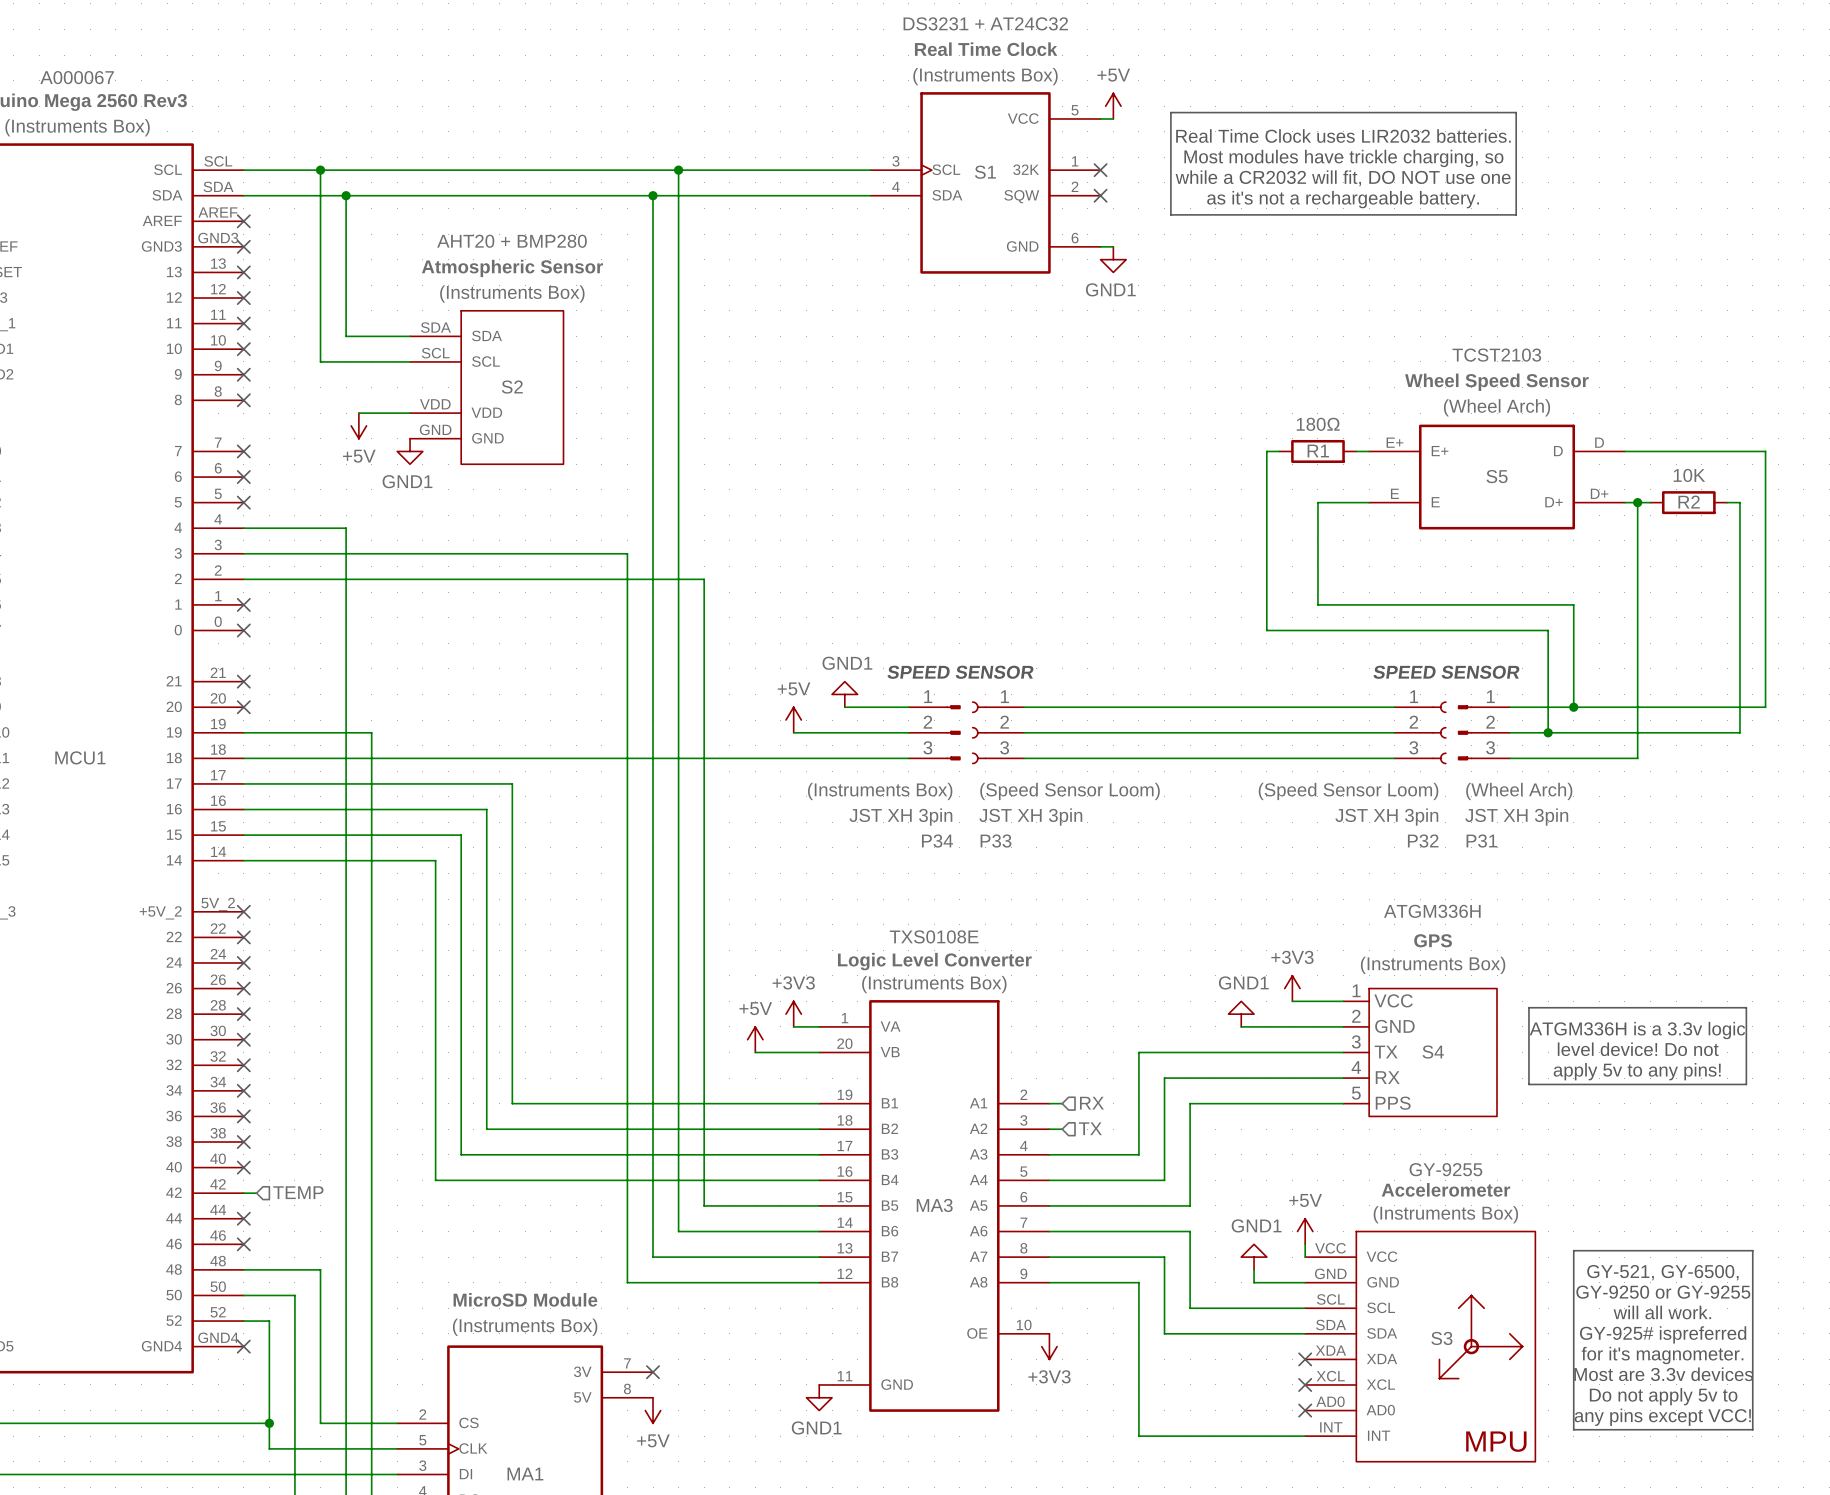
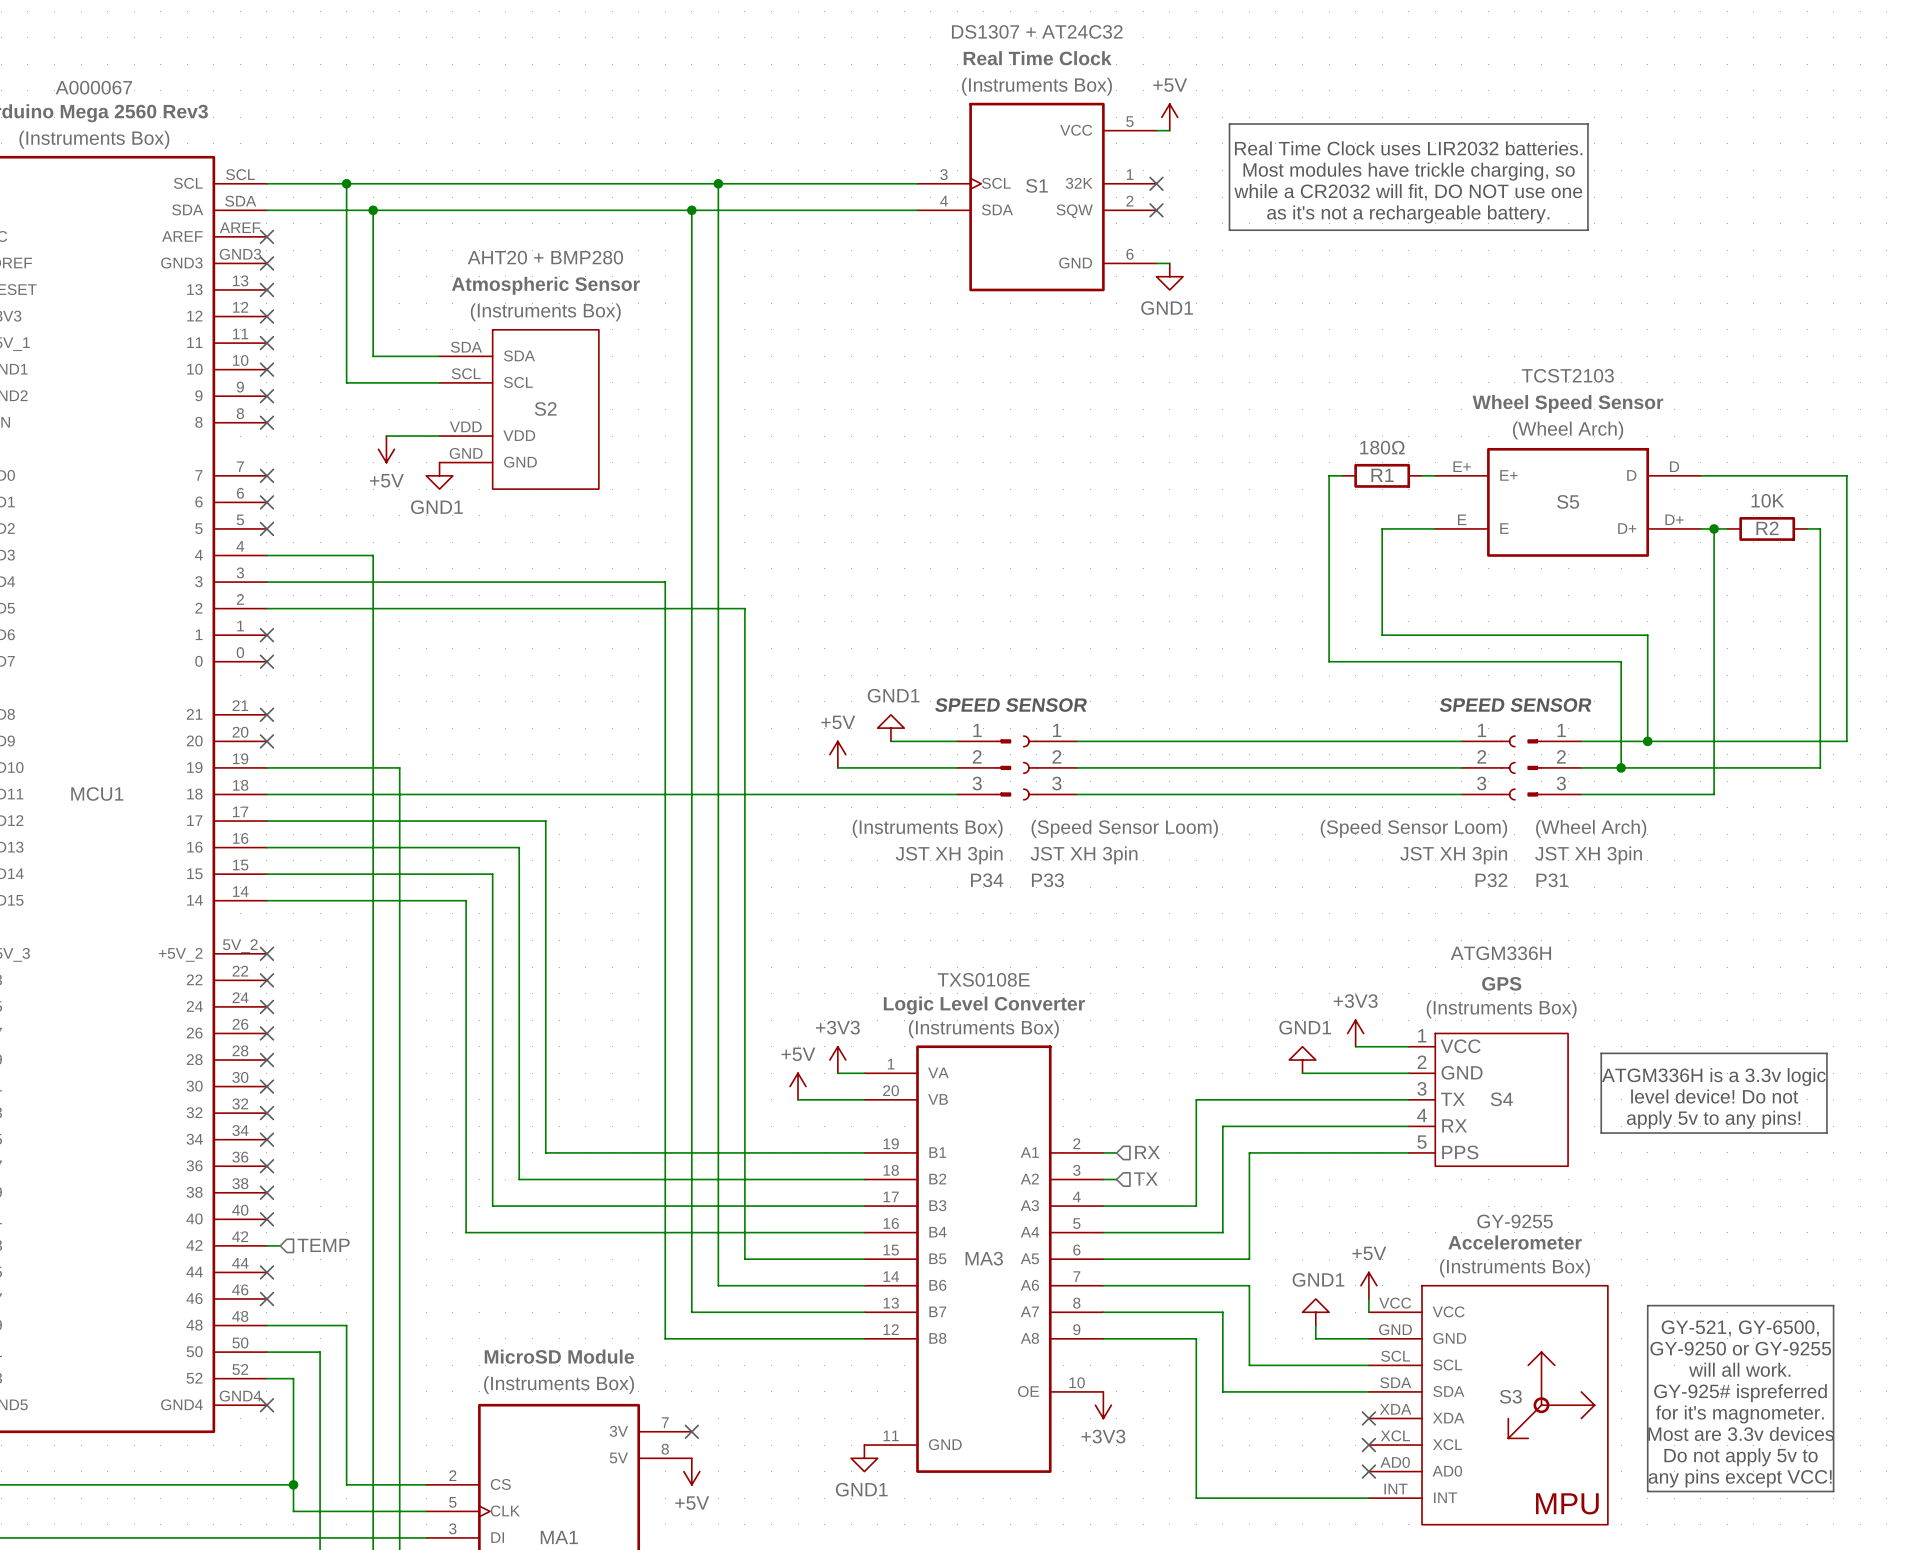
S1 value: DS3231 + AT24C32 (985, 23) -> DS1307 + AT24C32 (1037, 31)

